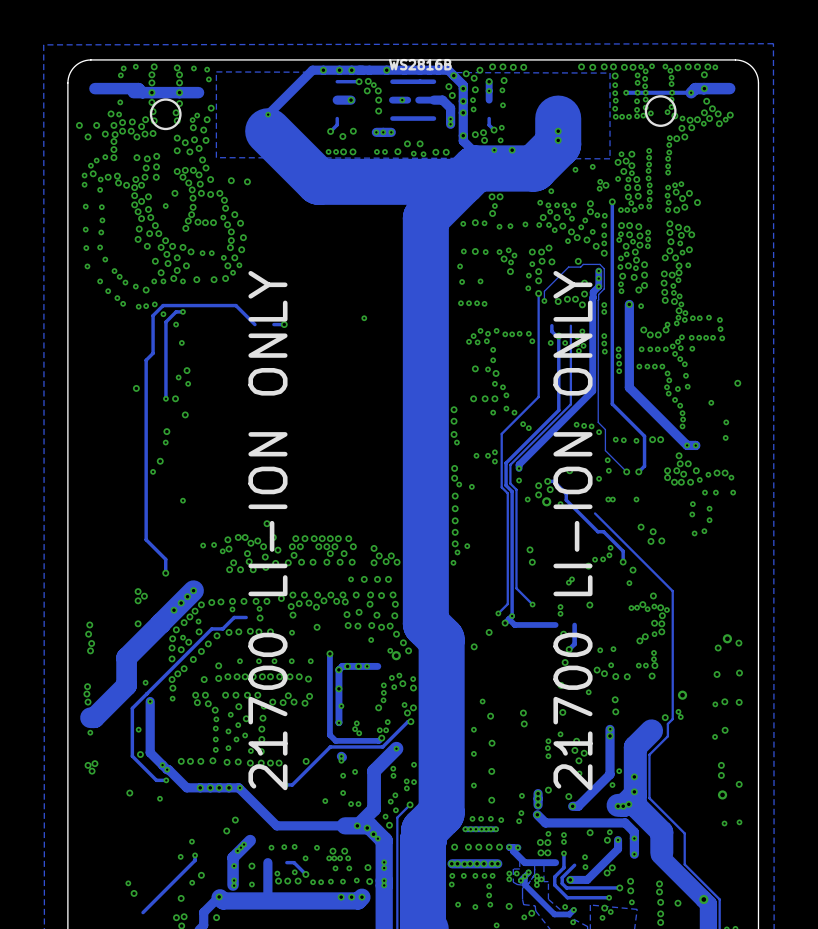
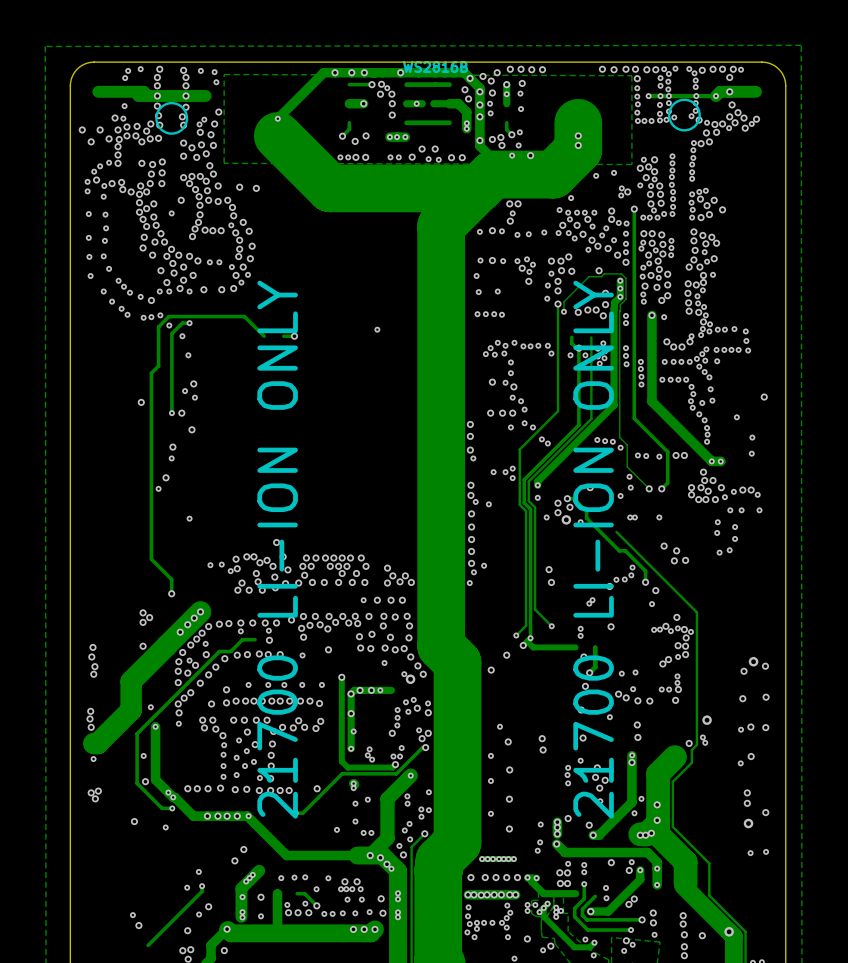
via: (472, 818) -> none
via: (481, 818) -> none
via: (490, 818) -> none
via: (501, 820) -> none
via: none -> (507, 905)
via: (463, 875) -> none
via: (475, 875) -> none
via: (484, 875) -> none
via: (492, 875) -> none
via: none -> (510, 912)
via: none -> (476, 922)
via: none -> (484, 922)
via: none -> (492, 922)
via: none -> (501, 922)
via: none -> (469, 924)
via: none -> (476, 928)
via: none -> (467, 932)
via: (475, 906) -> none

